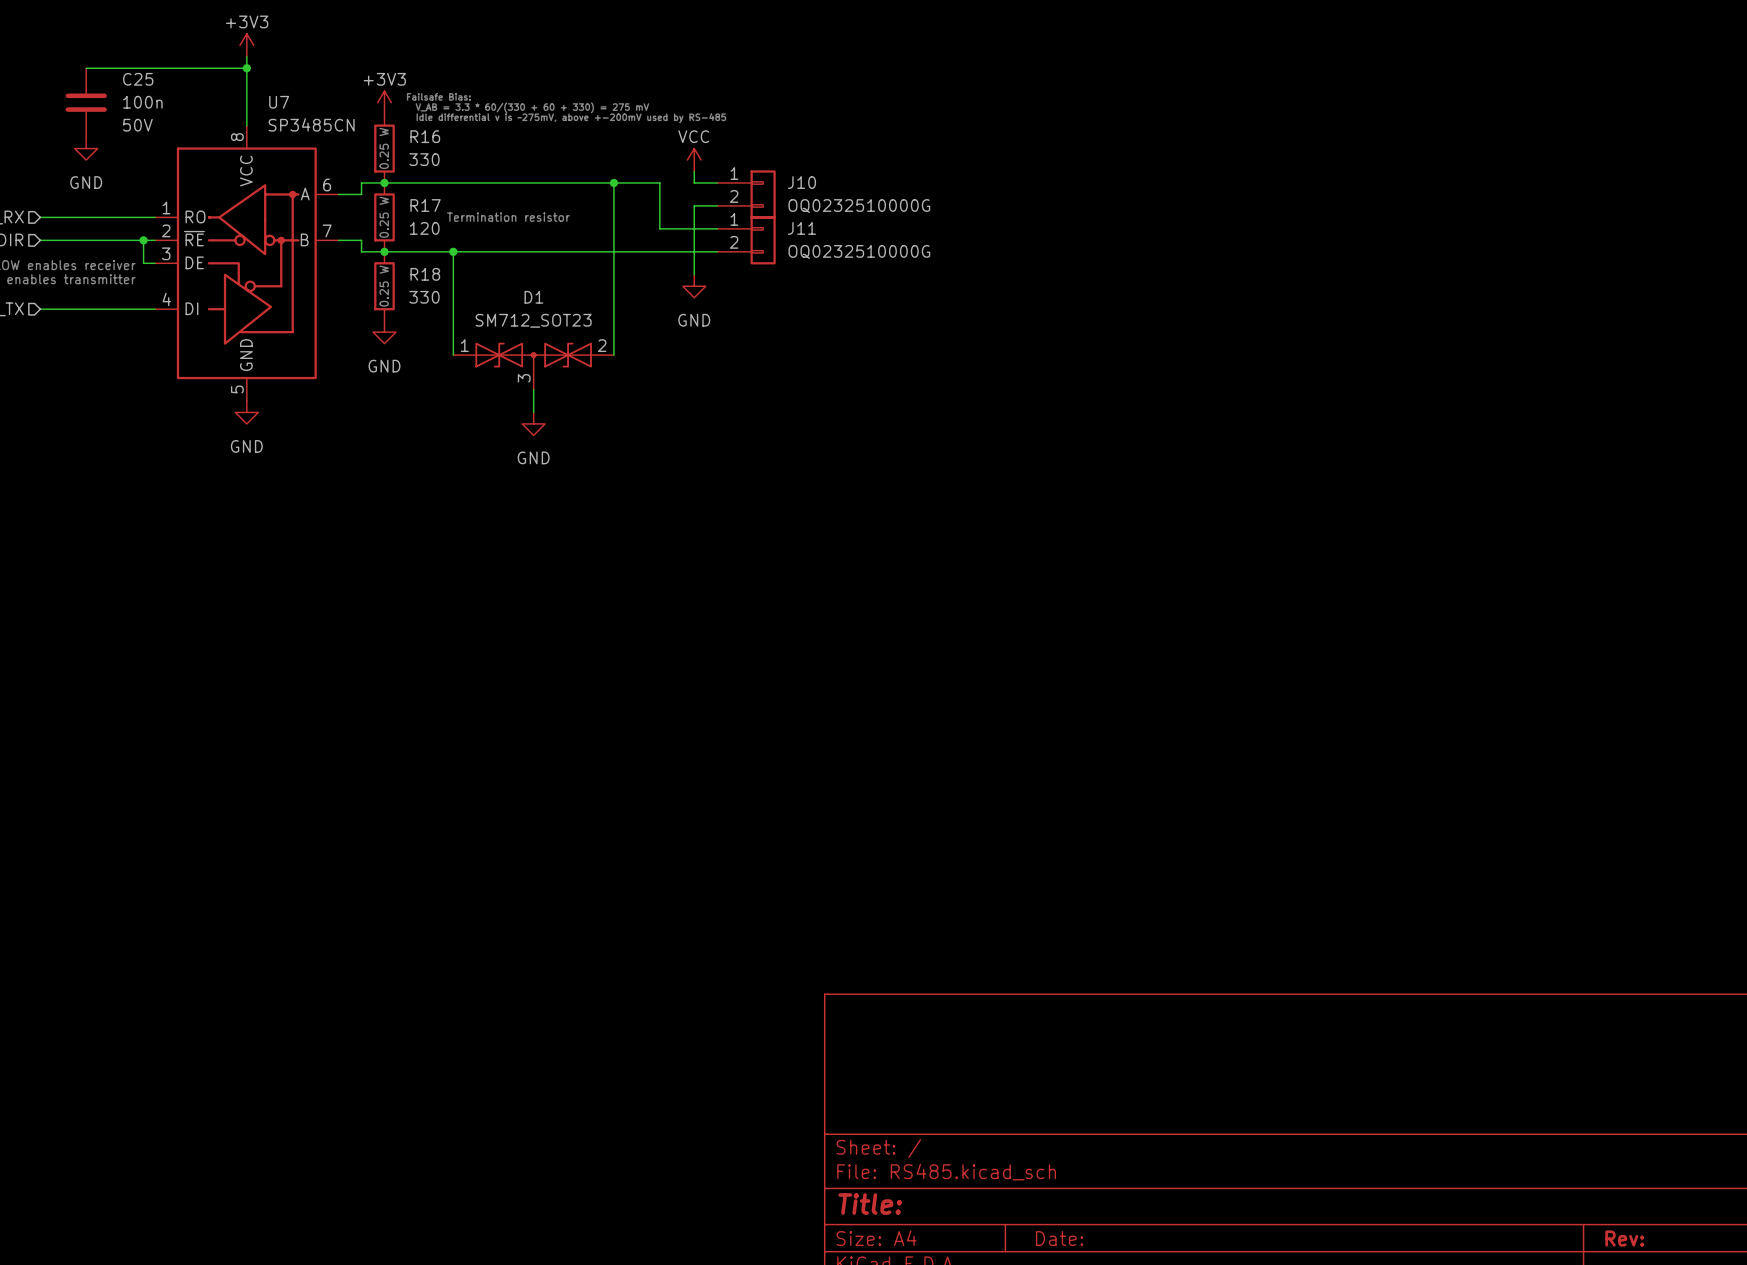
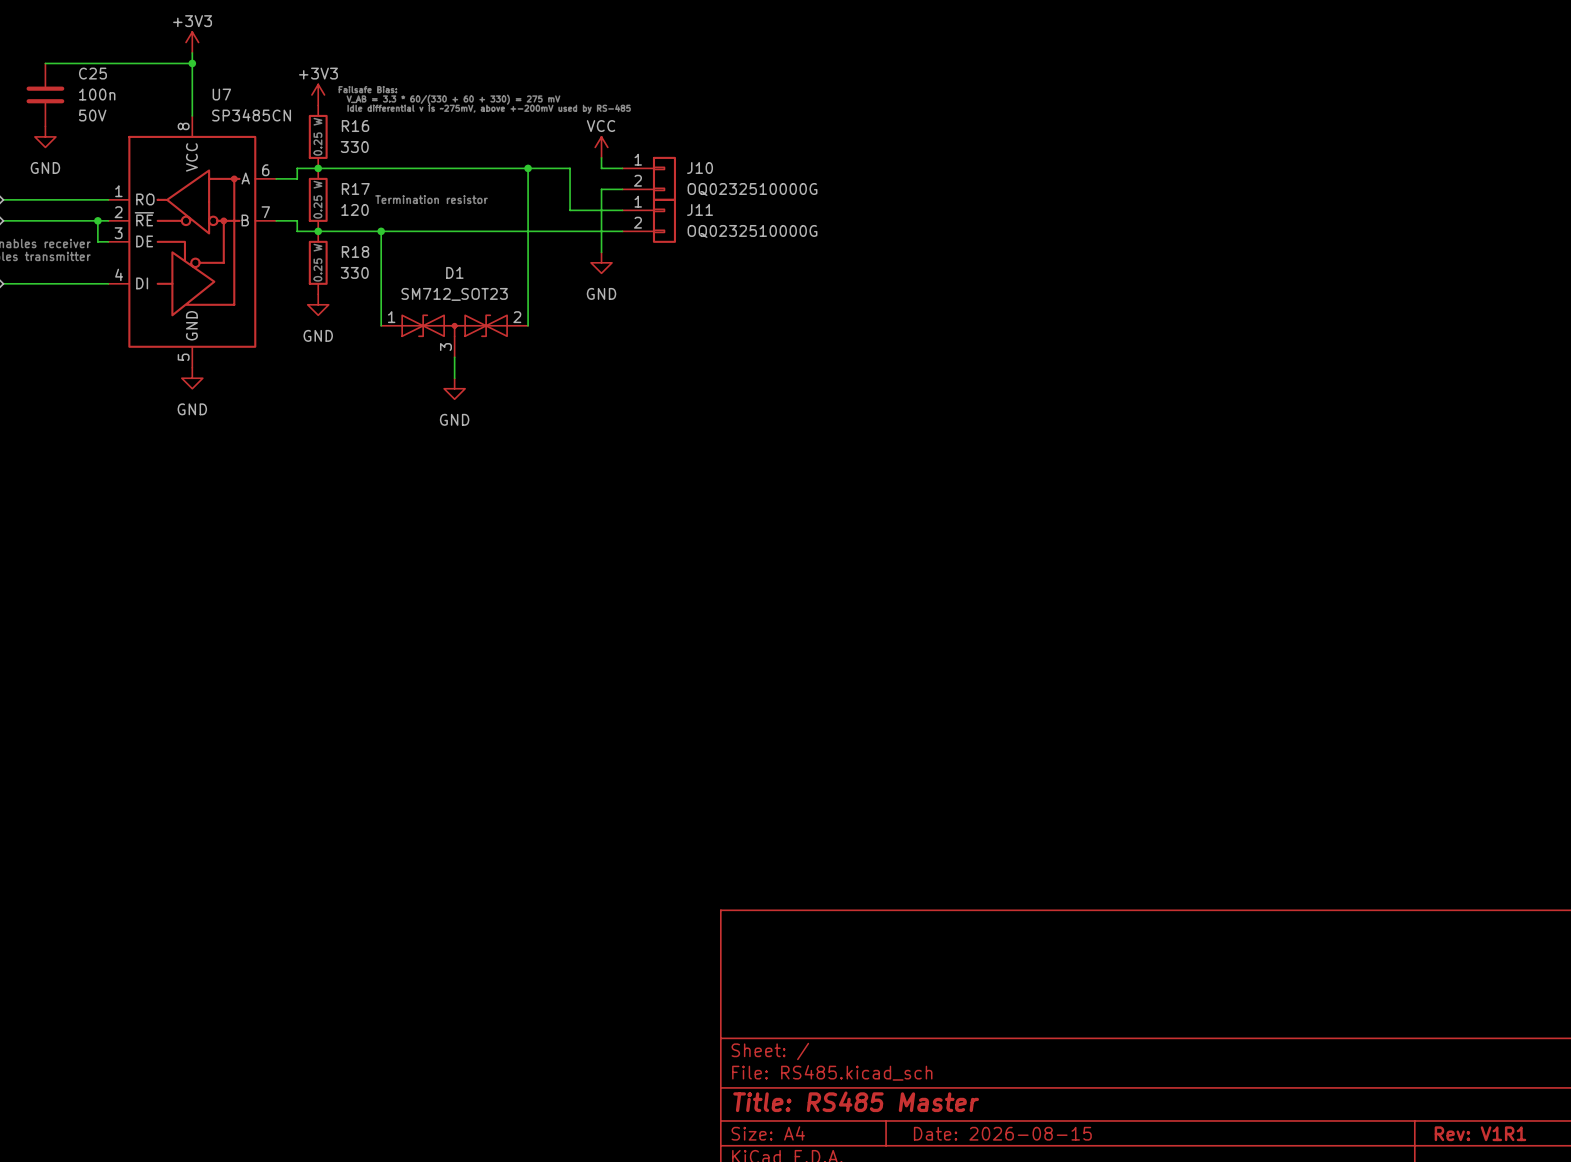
title block: Title: (870, 1204) -> Title: RS485 Master (856, 1101)
title block: Date: (1059, 1238) -> Date: 2026-08-15 (1002, 1133)
title block: Rev: (1624, 1238) -> Rev: V1R1 (1480, 1133)

